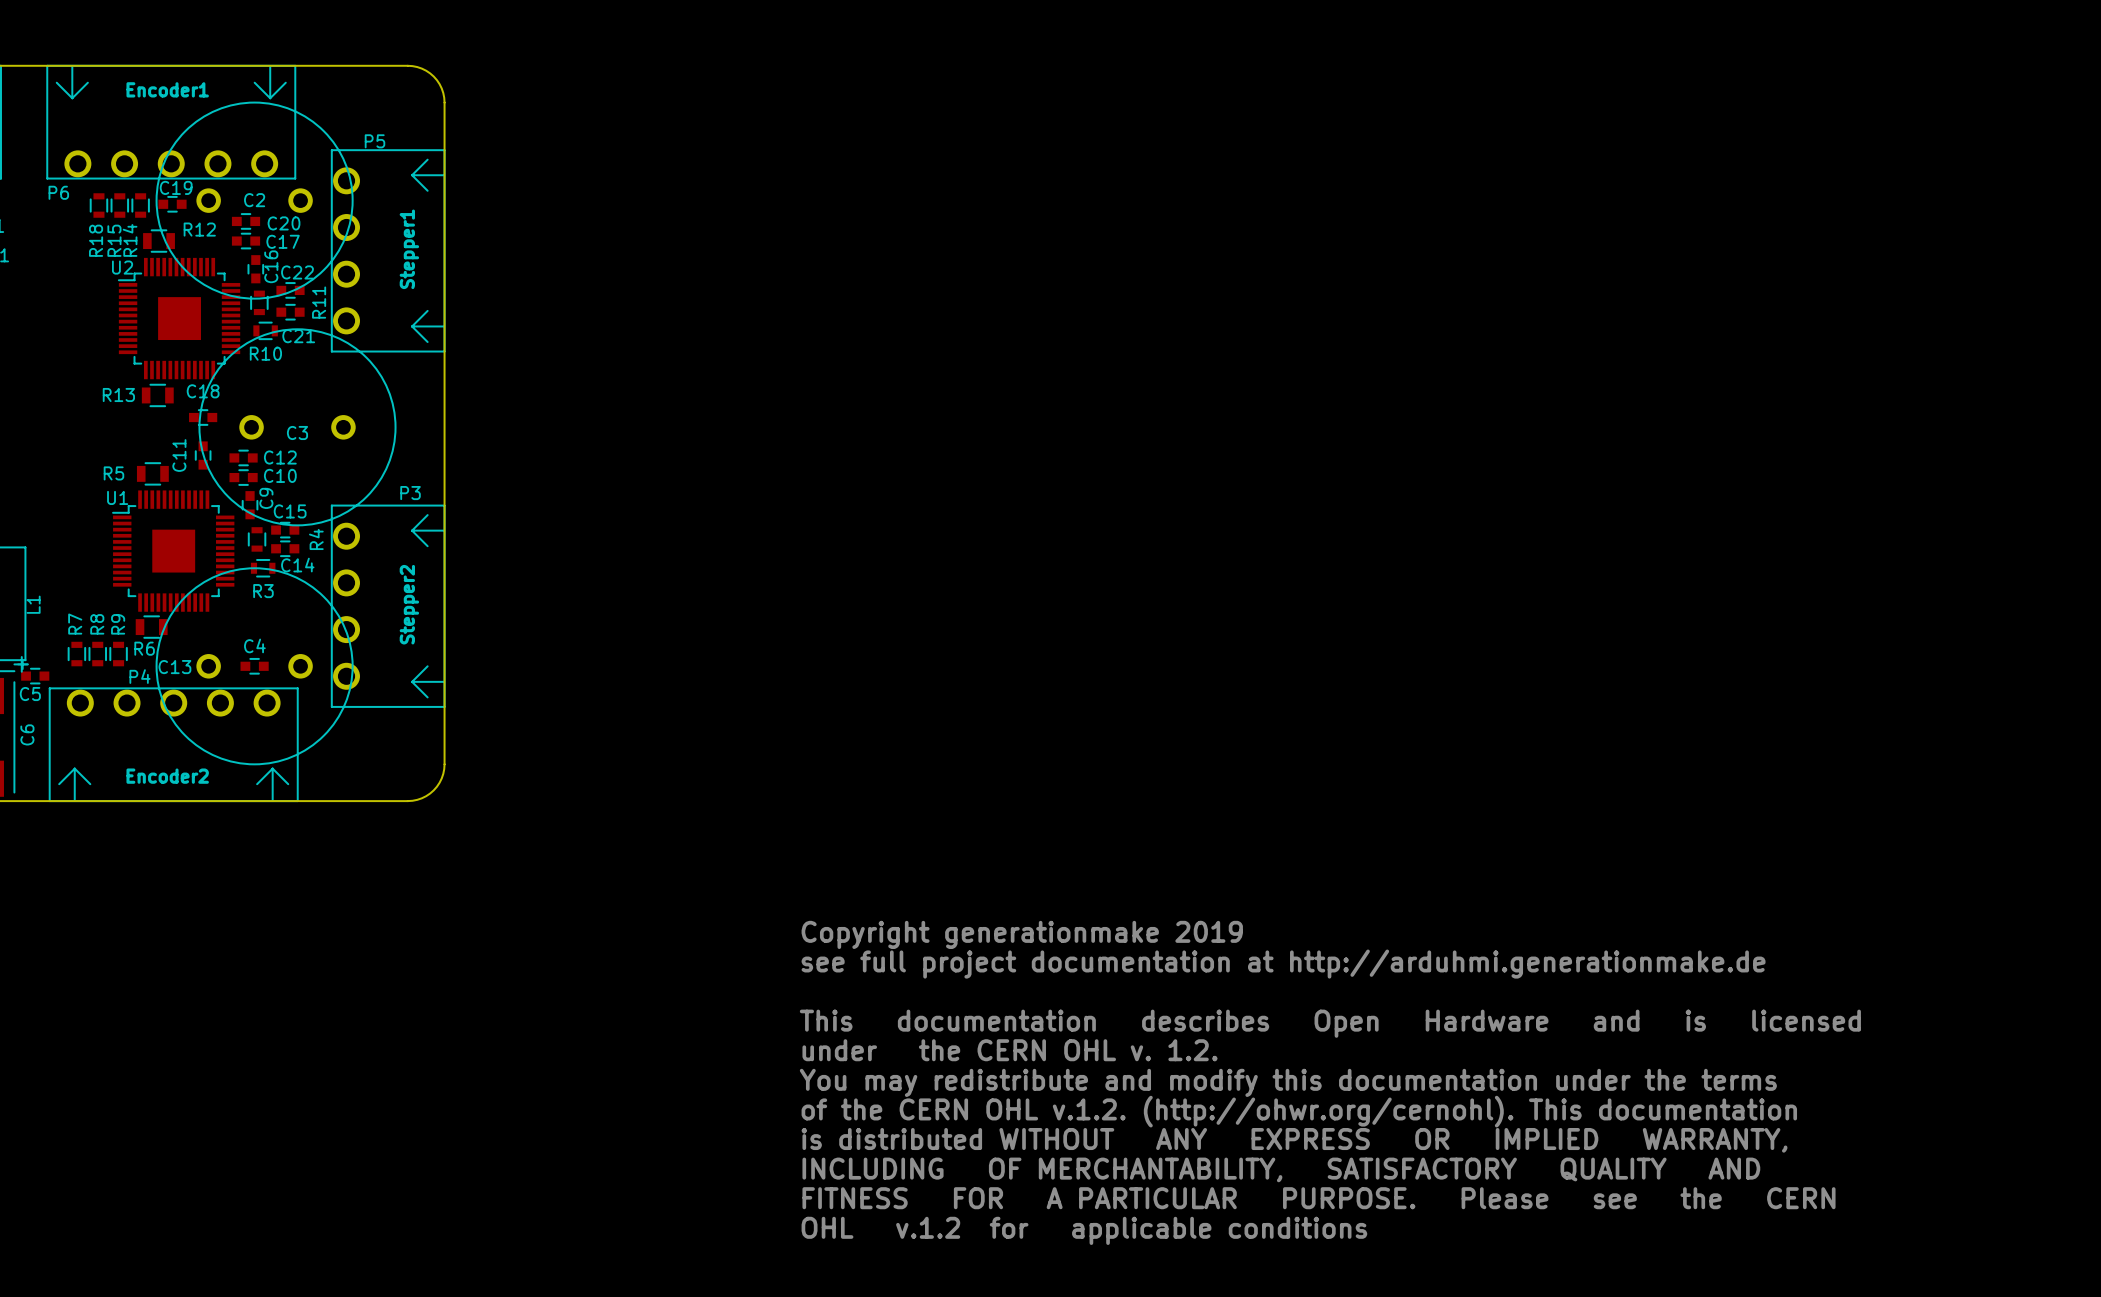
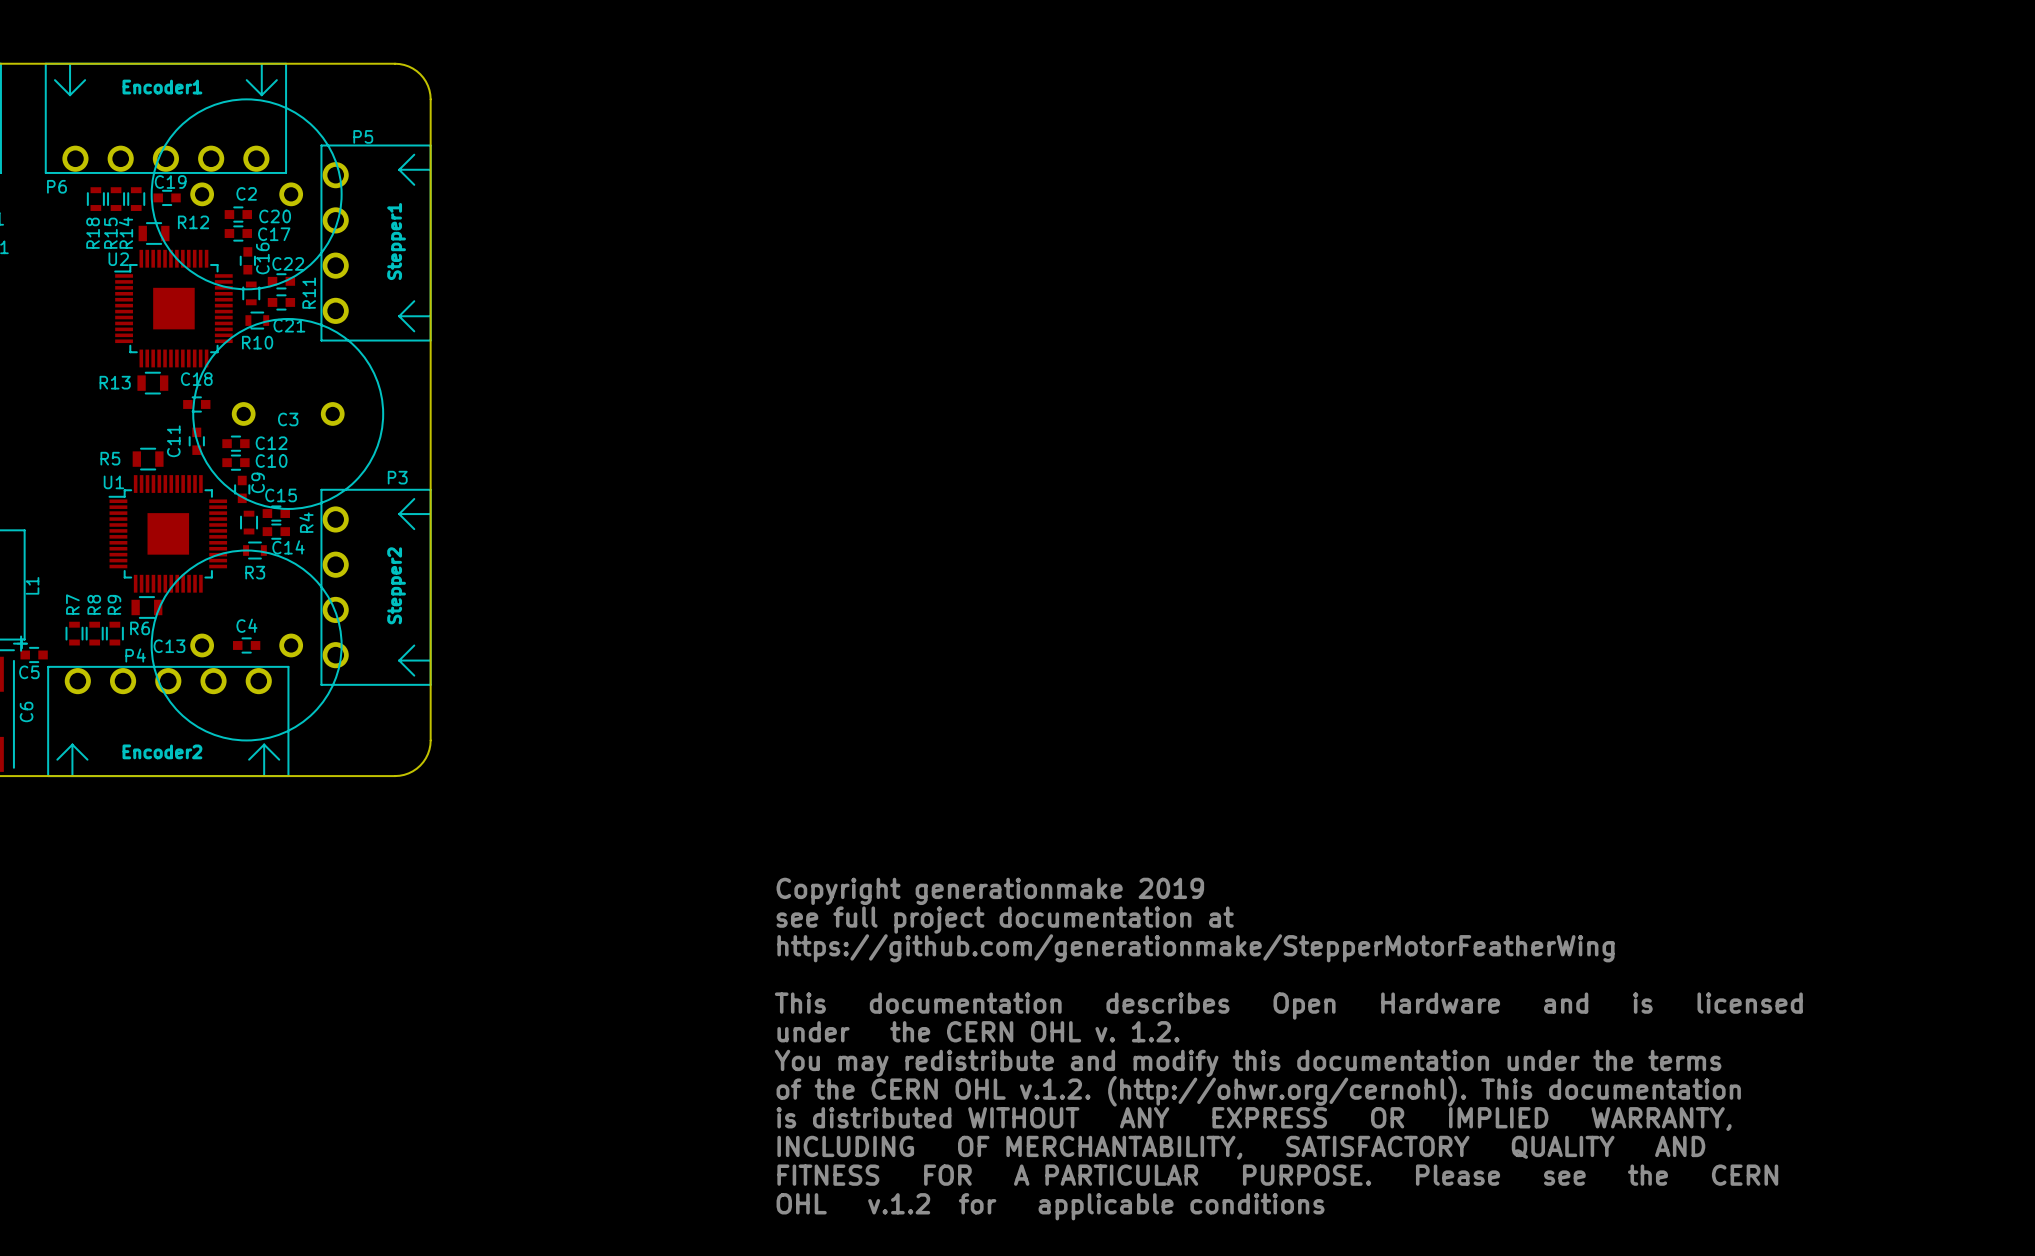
text position: Copyright generationmake 2019 (1022, 934) -> Copyright generationmake 2019 (990, 891)
text: see full project documentation at http://arduhmi.generationmake.de (1283, 964) -> see full project documentation at (1005, 920)
text: none -> https://github.com/generationmake/StepperMotorFeatherWing (1195, 948)
text position: This documentation describes Open Hardware and is licensed (1330, 1023) -> This documentation describes Open Hardware and is licensed (1288, 1006)
text position: under the CERN OHL v. 1.2. (1010, 1050) -> under the CERN OHL v. 1.2. (978, 1031)
text position: You may redistribute and modify this documentation under the terms (1288, 1082) -> You may redistribute and modify this documentation under the terms (1248, 1063)
text position: of the CERN OHL v.1.2. (http://ohwr.org/cernohl). This documentation (1299, 1111) -> of the CERN OHL v.1.2. (http://ohwr.org/cernohl). This documentation (1258, 1091)
text position: is distributed WITHOUT ANY EXPRESS OR IMPLIED WARRANTY, (1294, 1140) -> is distributed WITHOUT ANY EXPRESS OR IMPLIED WARRANTY, (1254, 1119)
text position: INCLUDING OF MERCHANTABILITY, SATISFACTORY QUALITY AND (1281, 1169) -> INCLUDING OF MERCHANTABILITY, SATISFACTORY QUALITY AND (1241, 1147)
text position: FITNESS FOR A PARTICULAR PURPOSE. Please see the CERN (1319, 1198) -> FITNESS FOR A PARTICULAR PURPOSE. Please see the CERN (1277, 1175)
text position: OHL v.1.2 for applicable conditions (1084, 1230) -> OHL v.1.2 for applicable conditions (1050, 1206)

